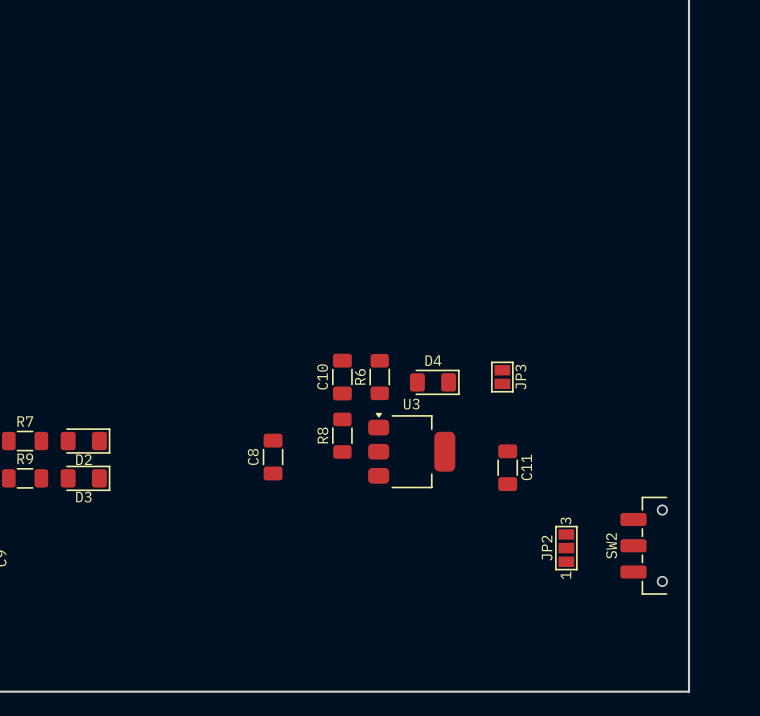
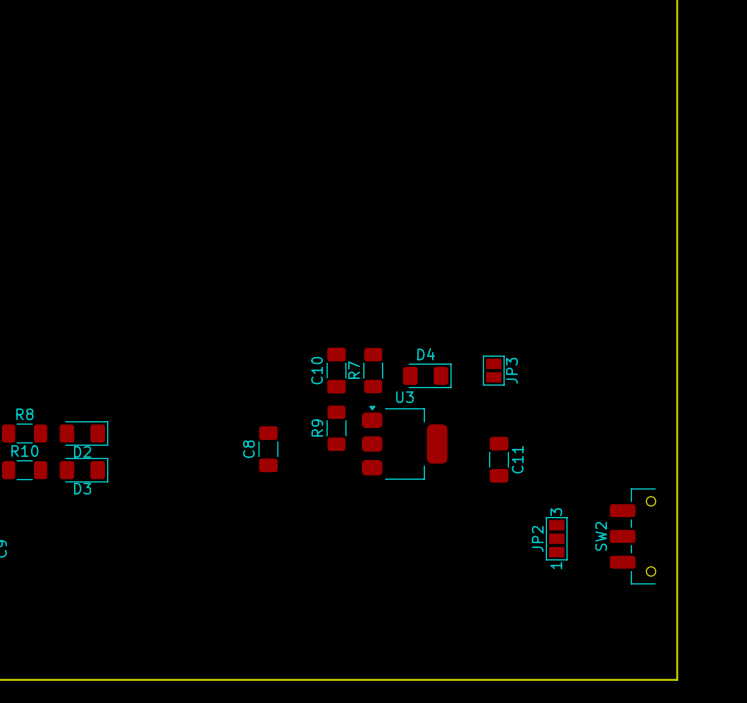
R6 name: R6 (360, 376) -> R7 (354, 370)
R7 name: R7 (25, 421) -> R8 (24, 414)
R8 name: R8 (322, 435) -> R9 (317, 428)
R9 name: R9 (25, 458) -> R10 (24, 451)

